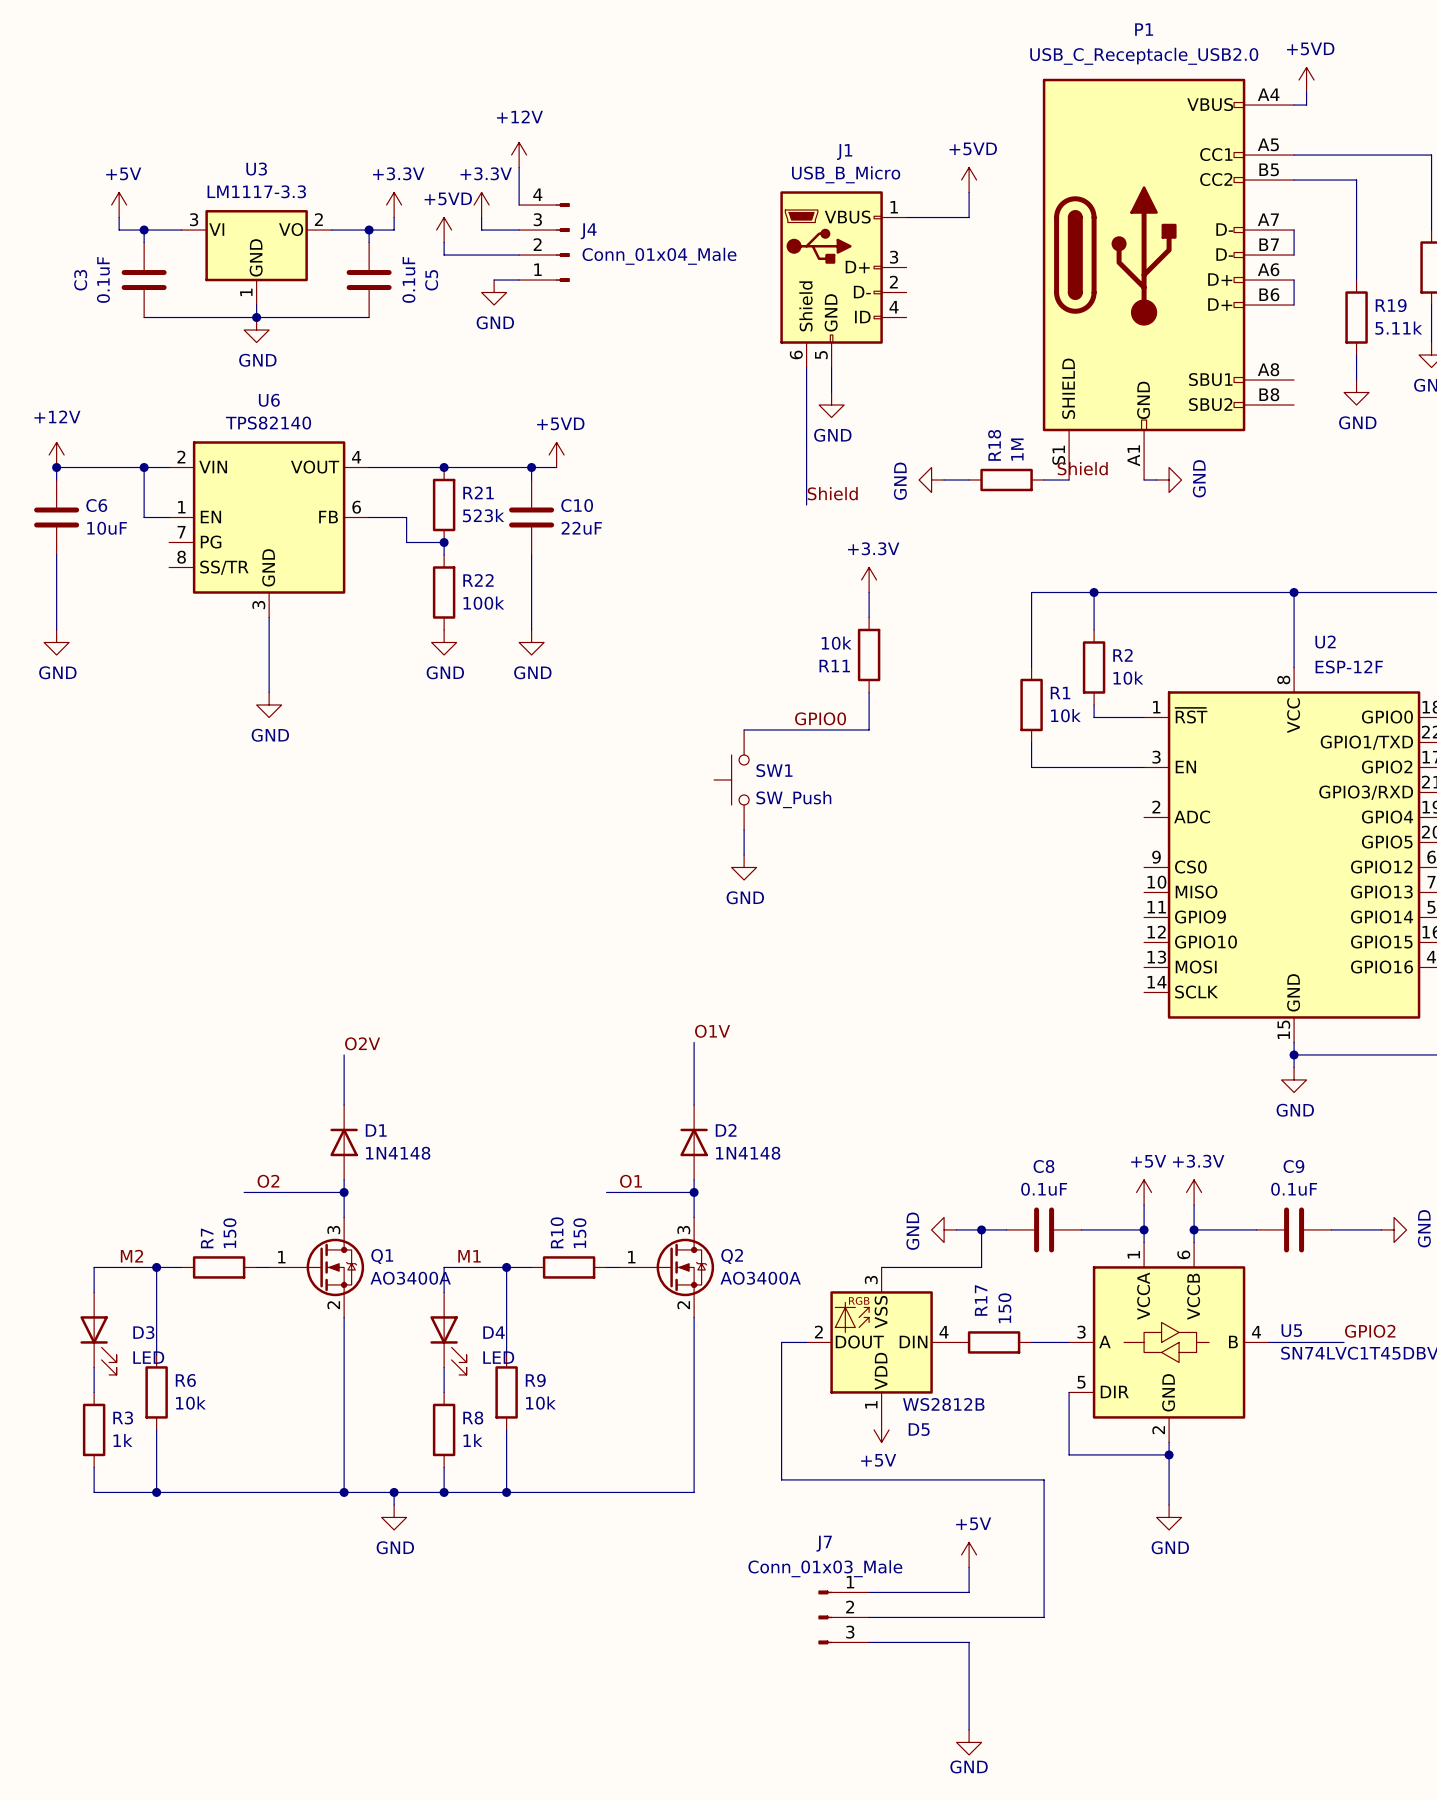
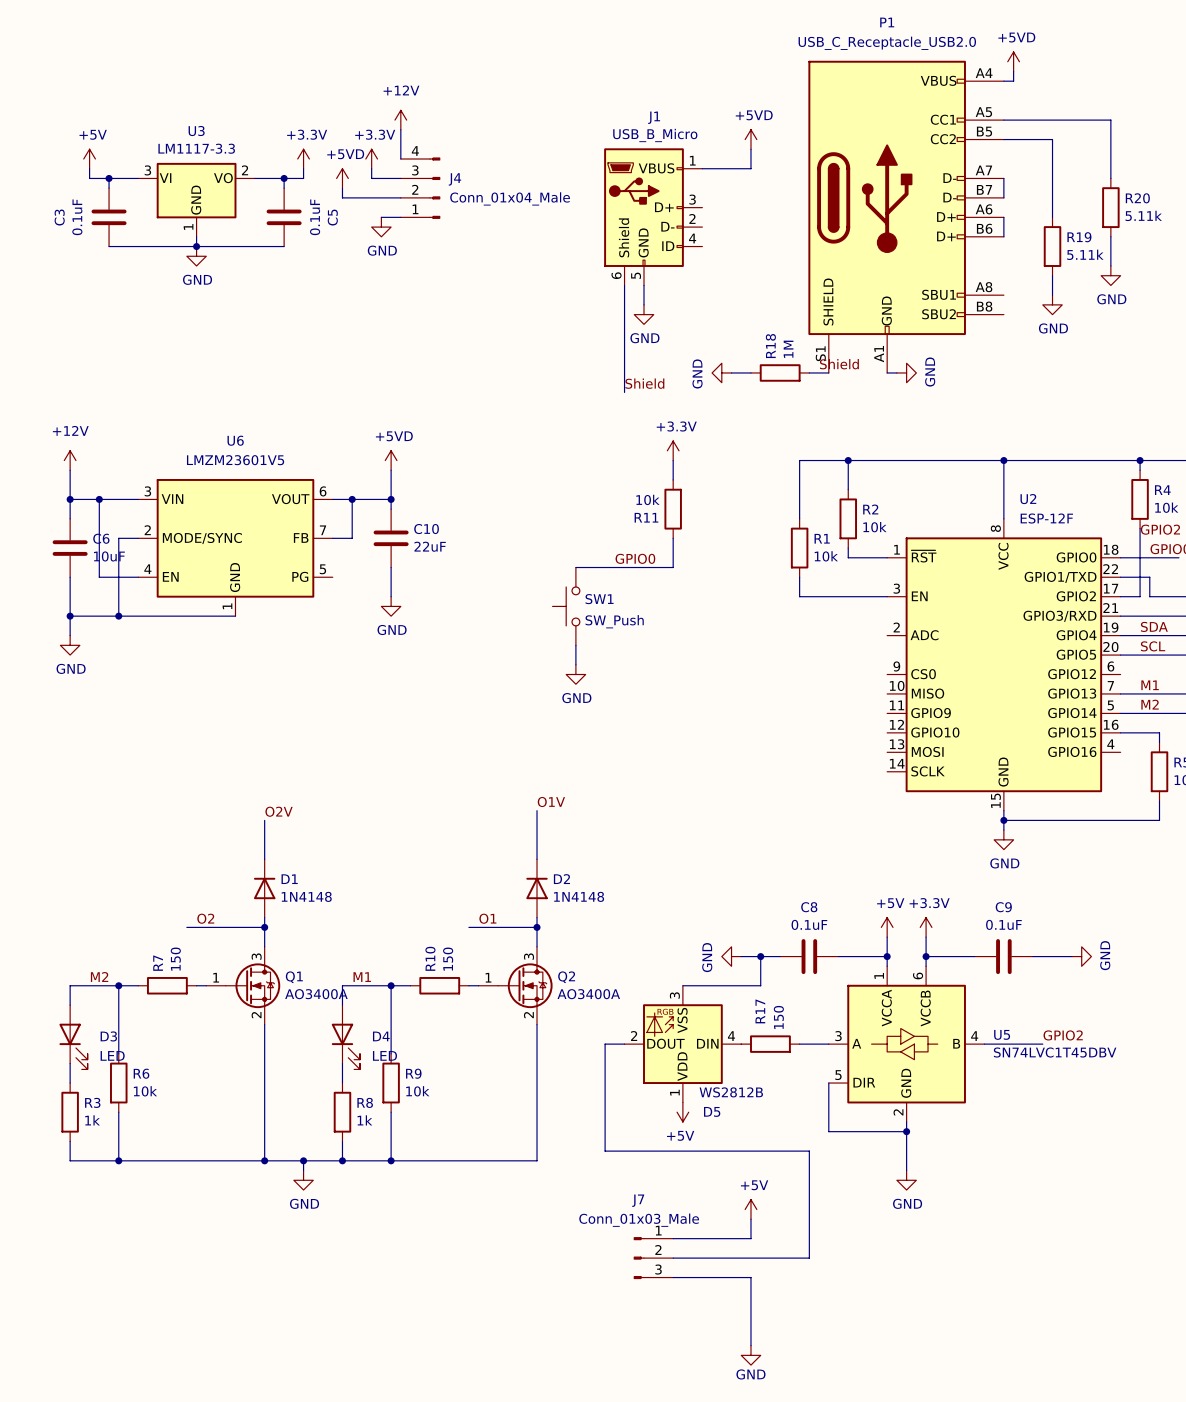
U6 value: TPS82140 (268, 423) -> LMZM23601V5 (235, 460)
U6 symbol: [169, 441, 370, 618] -> [138, 479, 333, 617]
power symbol position: +12V (56, 455) -> +12V (70, 460)
power symbol position: +5VD (556, 455) -> +5VD (391, 460)
junction: (56, 467) -> none
wire: (144, 467) (144, 517) (169, 517) -> none
junction: (144, 467) -> none
wire: (169, 467) (56, 467) (56, 480) -> none
wire: (369, 467) (556, 467) -> none
junction: (444, 467) -> none
wire: (531, 467) (531, 480) -> none
junction: (531, 467) -> none
R21: 523k (444, 505) -> none
C6 position: (56, 517) -> (70, 548)
wire: (369, 517) (406, 517) (406, 542) (444, 542) (444, 555) -> none
C10 position: (531, 517) -> (391, 538)
junction: (444, 542) -> none
wire: (56, 555) (56, 629) -> (70, 577) (70, 635)
wire: (531, 555) (531, 629) -> none
R22: 100k (444, 592) -> none
wire: none -> (70, 470) (70, 518)
wire: none -> (391, 470) (391, 509)
power symbol: GND (56, 642) -> none
wire: none -> (70, 499) (138, 499)
junction: none -> (70, 499)
wire: none -> (99, 499) (99, 577) (138, 577)
junction: none -> (99, 499)
wire: none -> (332, 499) (391, 499)
power symbol: GND (444, 642) -> none
wire: none -> (352, 499) (352, 538) (332, 538)
junction: none -> (352, 499)
junction: none -> (391, 499)
power symbol: GND (531, 642) -> none
wire: none -> (138, 538) (118, 538) (118, 616)
power symbol: GND (269, 704) -> none
wire: none -> (391, 567) (391, 596)
power symbol: none -> GND (391, 606)
wire: none -> (70, 616) (235, 616)
junction: none -> (70, 616)
junction: none -> (118, 616)
power symbol: none -> GND (70, 645)

